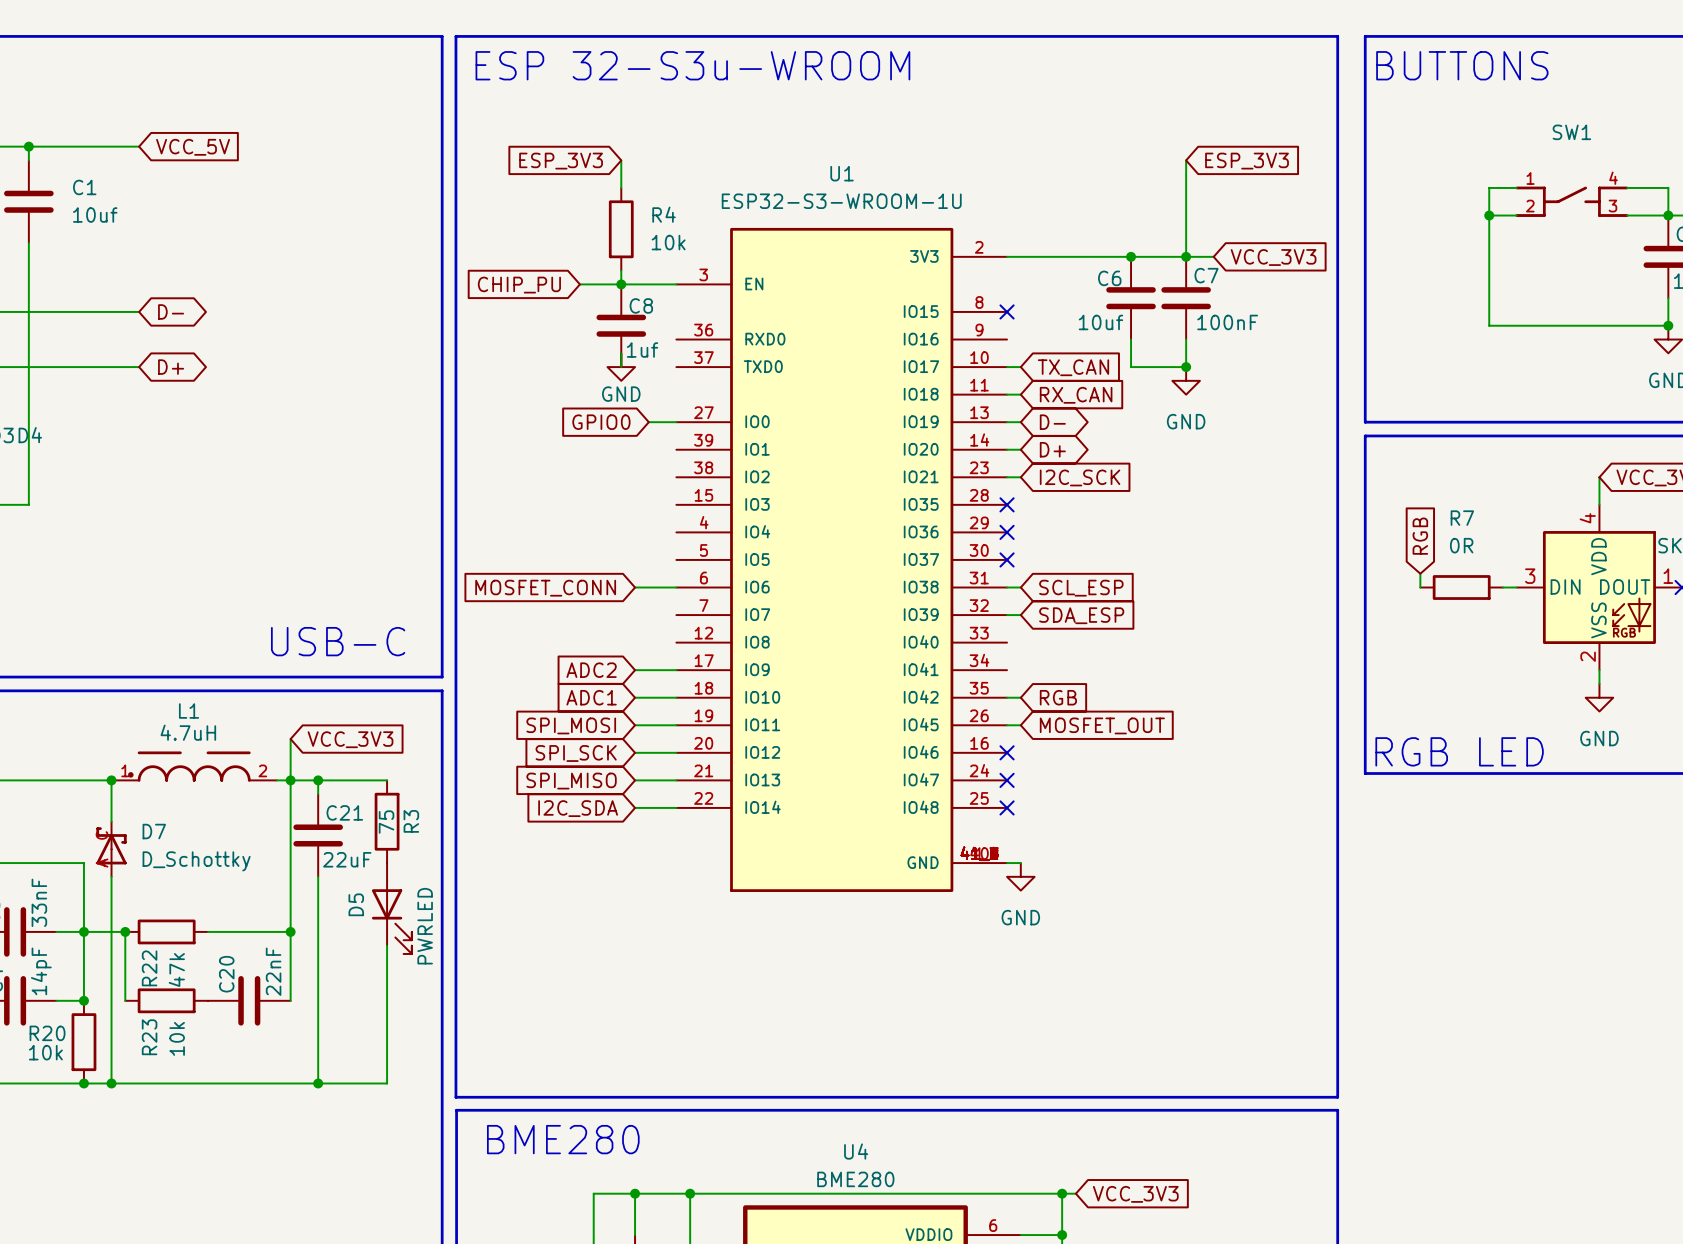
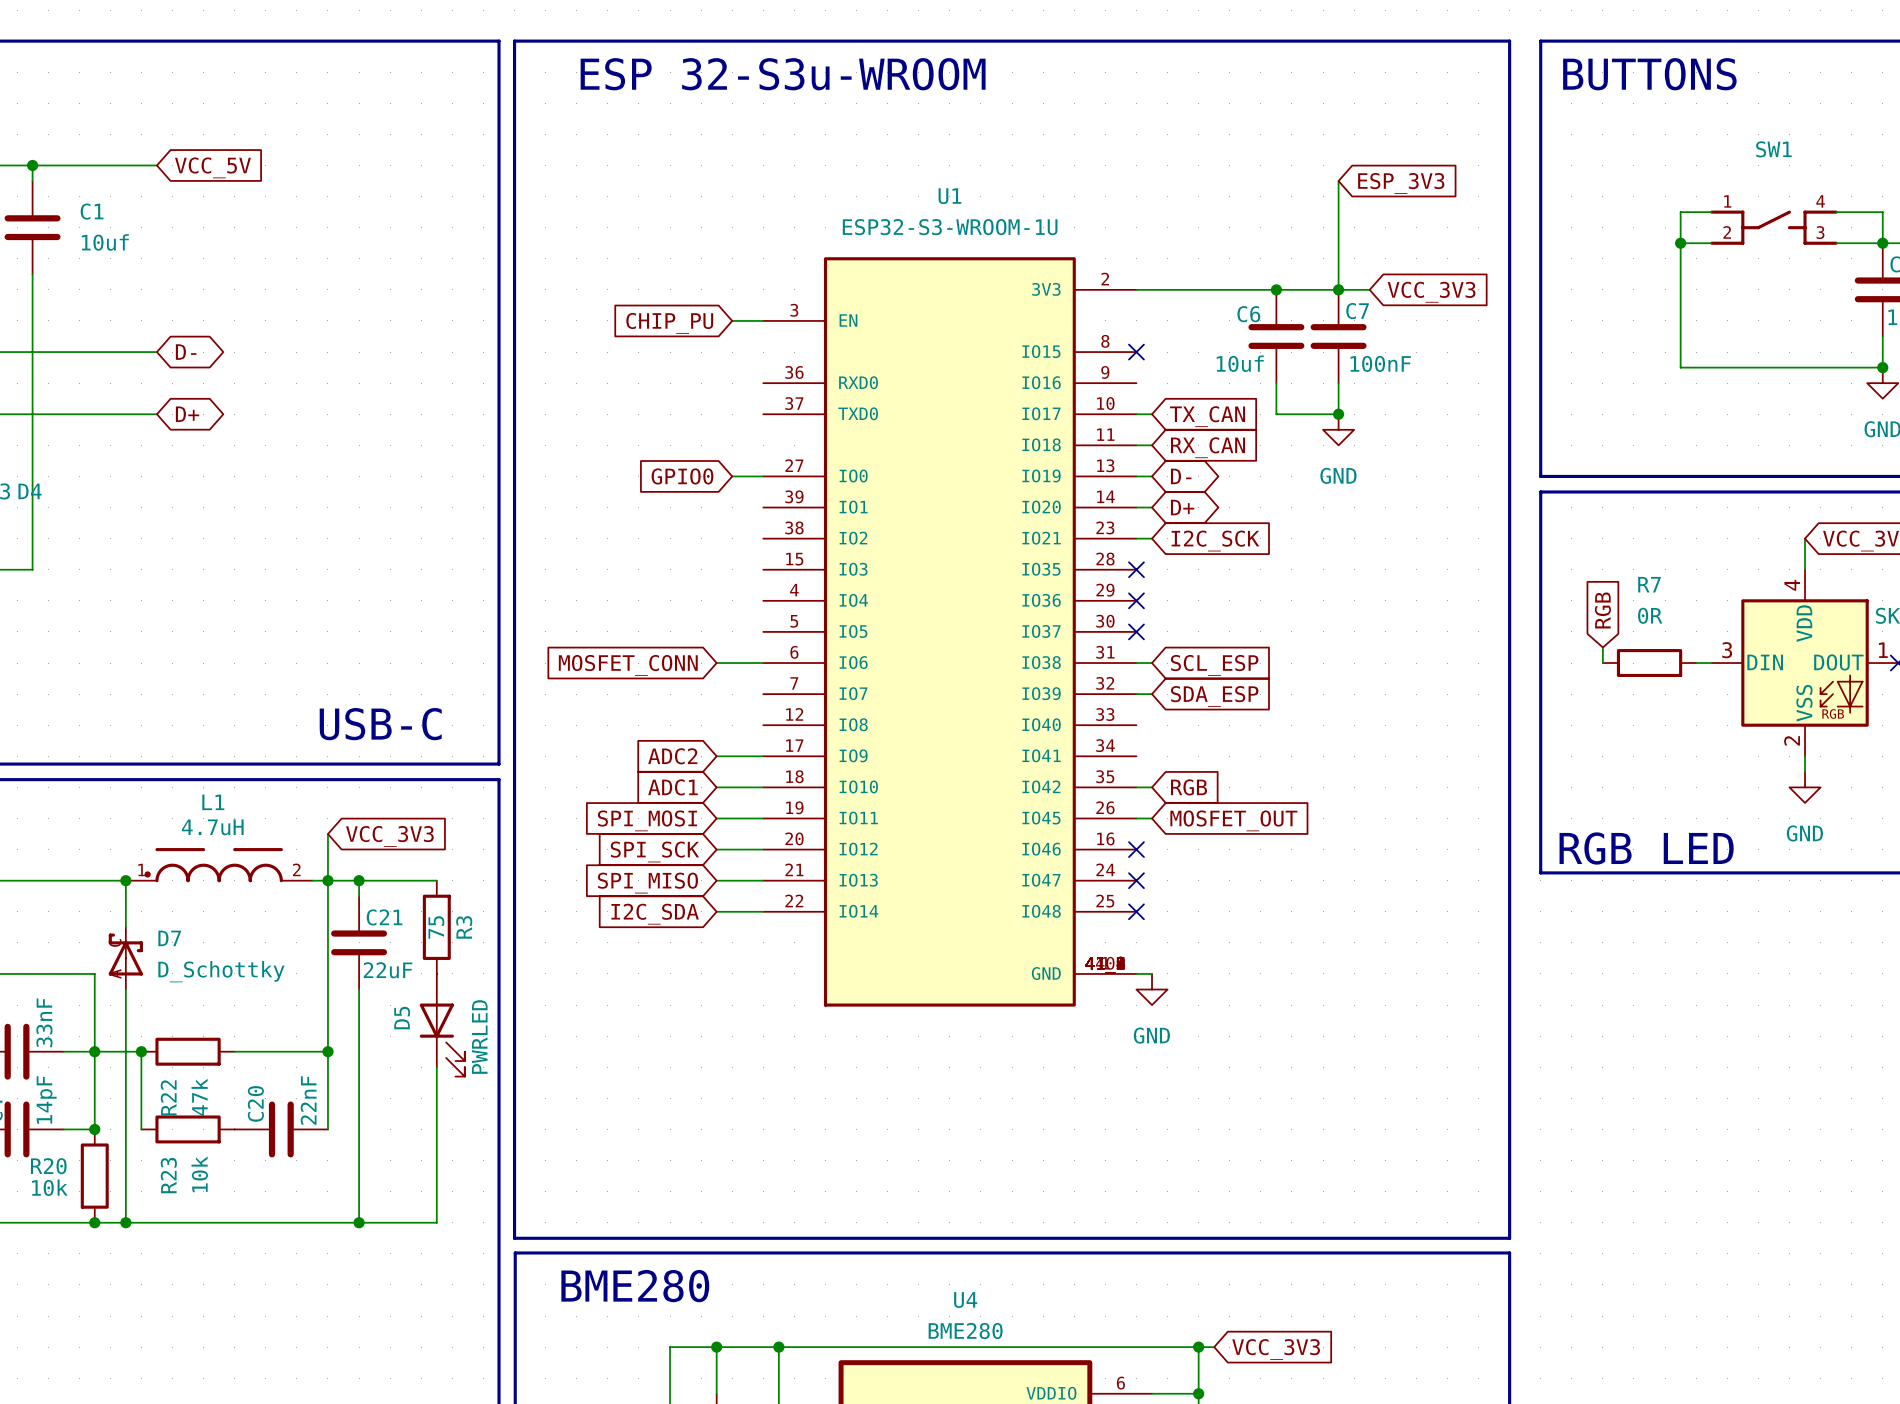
wire: (621, 160) (621, 187) -> none
global label: ESP_3V3 (561, 161) -> none
R4: 10k (621, 229) -> none
wire: (579, 284) (648, 284) -> none
junction: (621, 284) -> none
global label position: CHIP_PU (519, 285) -> CHIP_PU (669, 323)
C8: 1uf (621, 325) -> none
wire: (621, 353) (621, 367) -> none
power symbol: GND (621, 367) -> none

